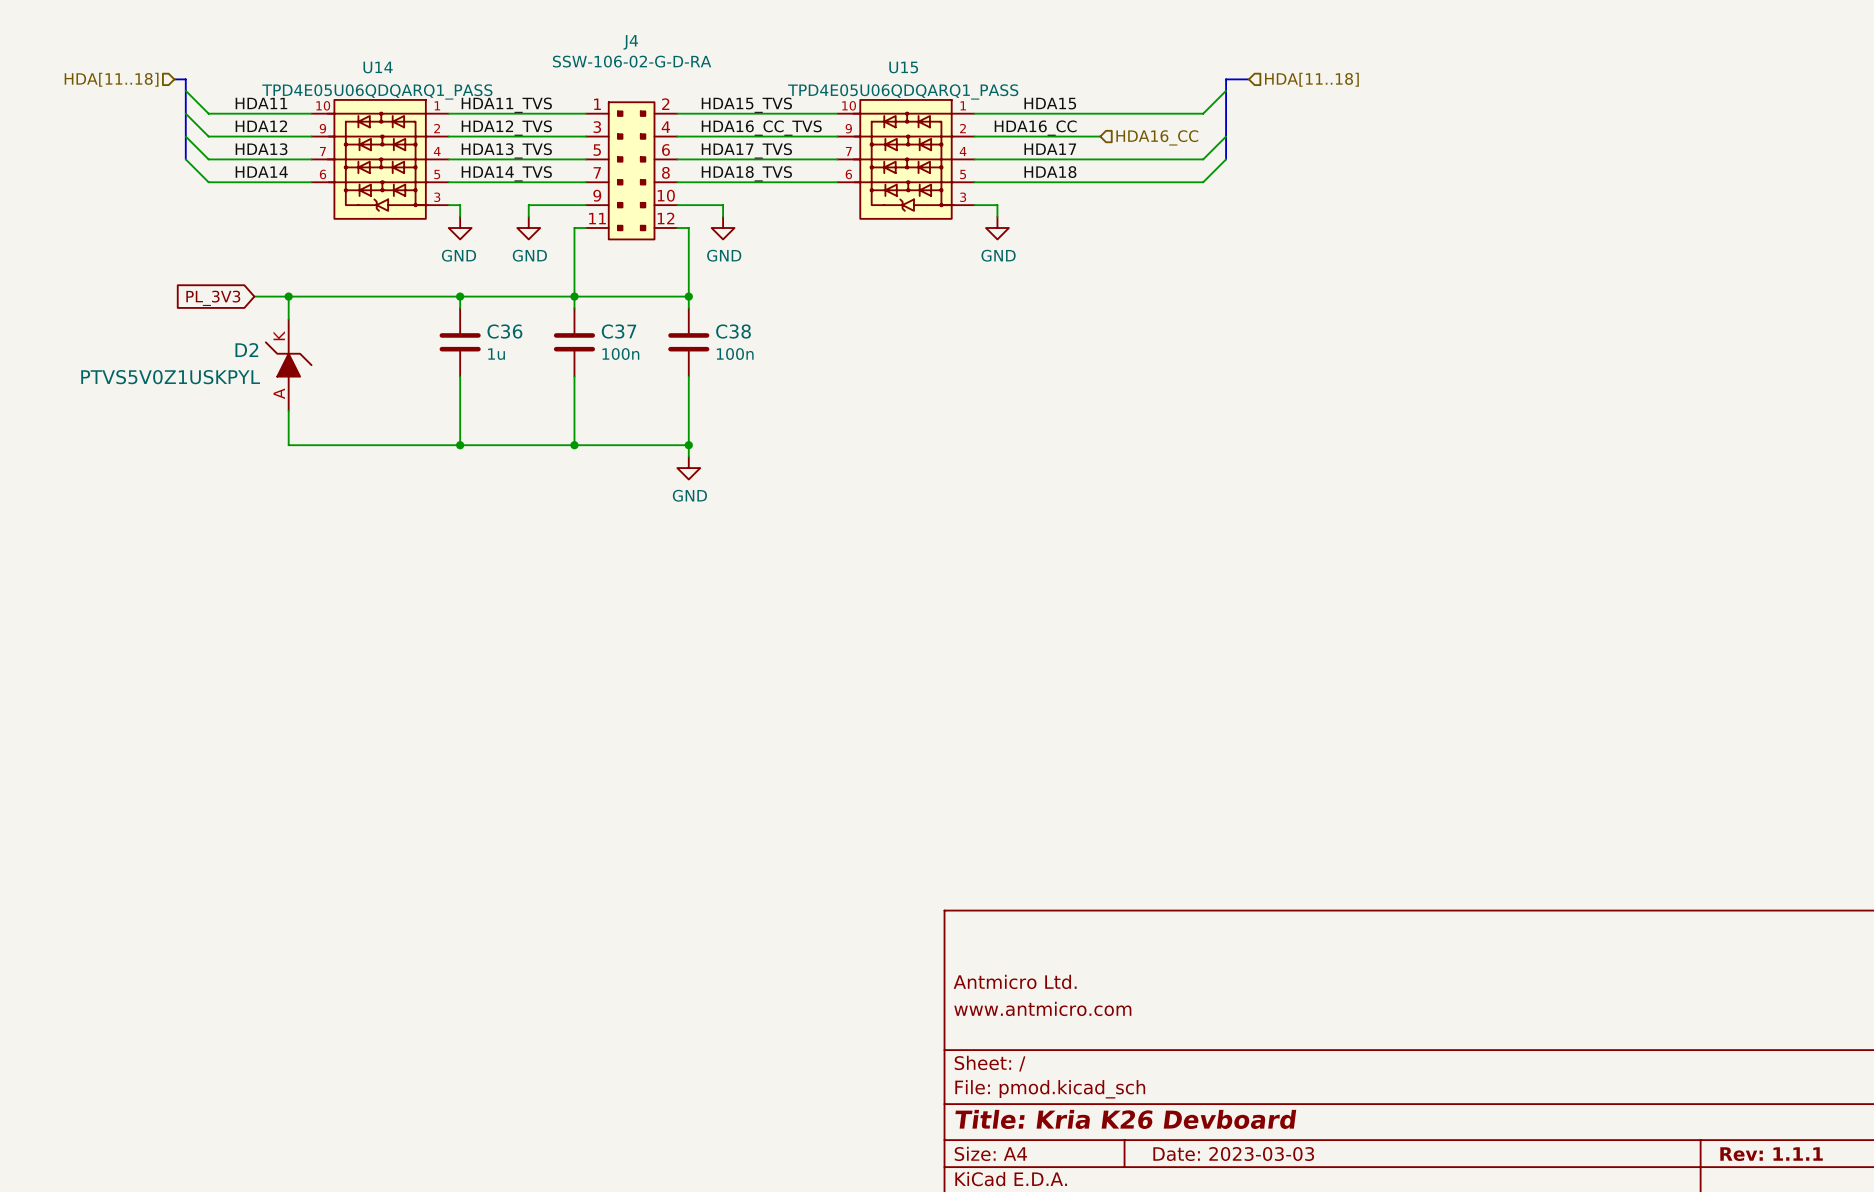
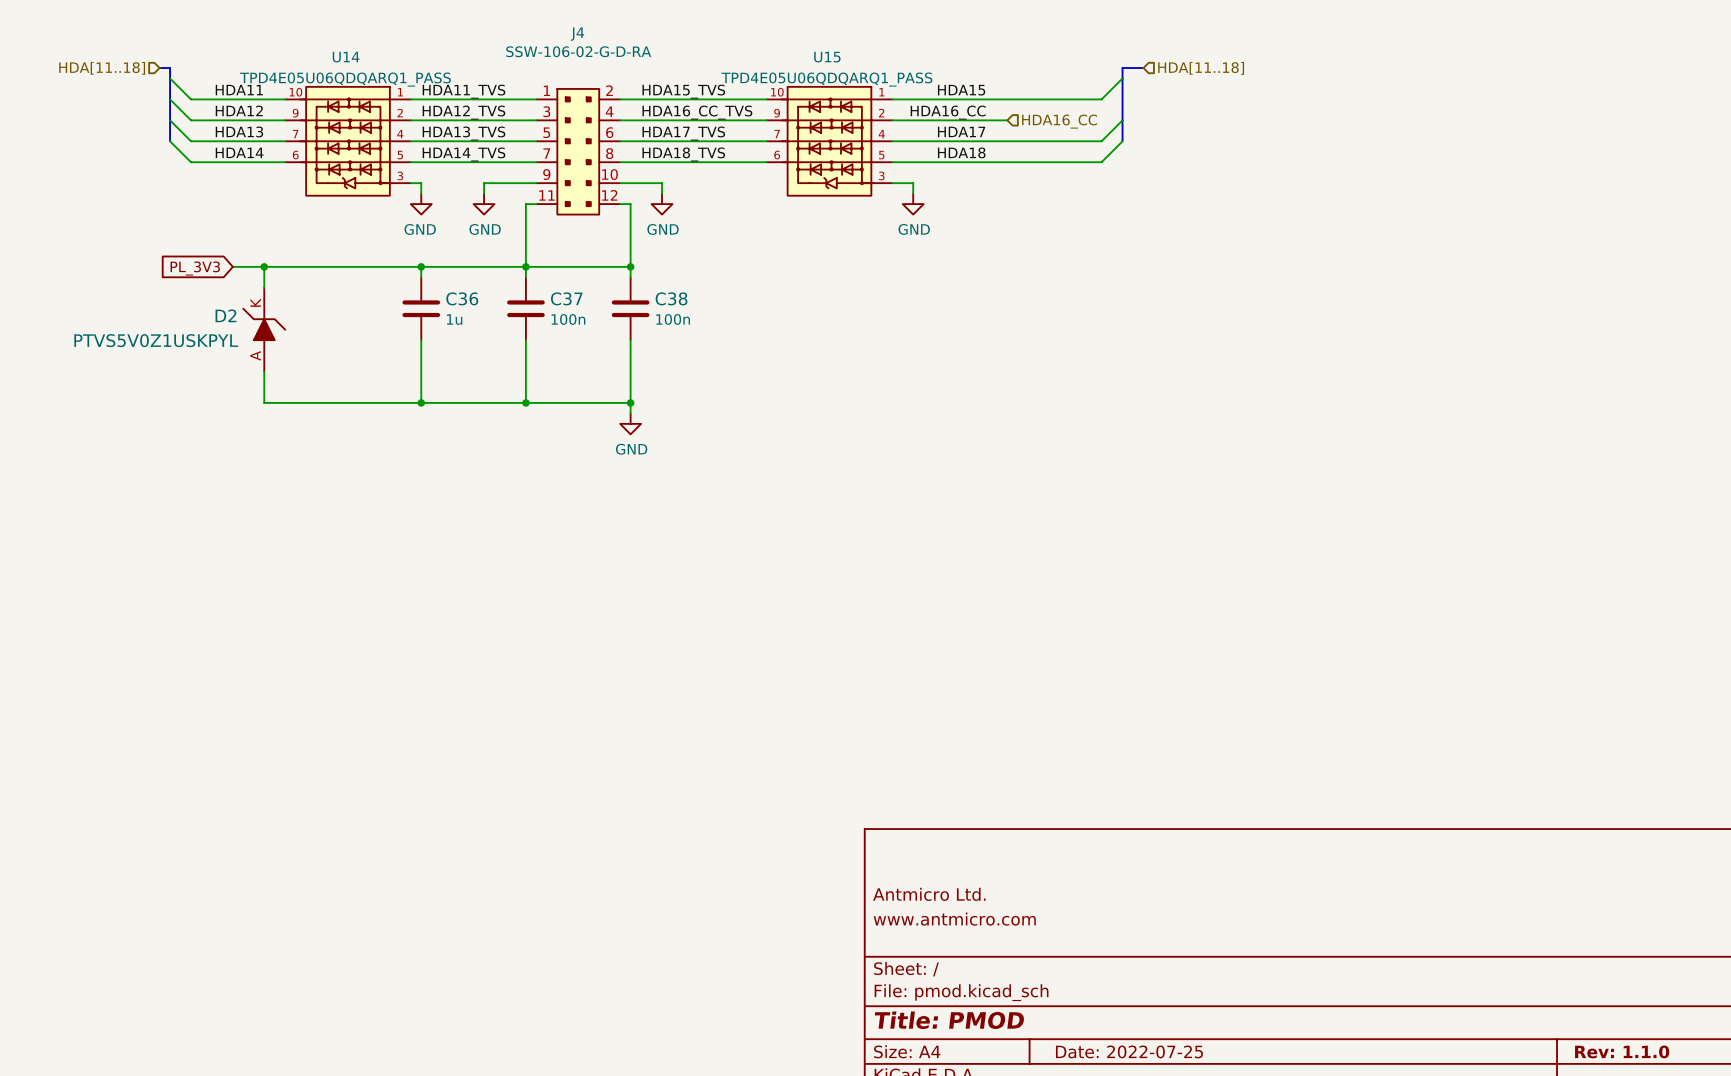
title block: Title: Kria K26 Devboard (1125, 1119) -> Title: PMOD (949, 1020)
title block: Date: 2023-03-03 (1233, 1154) -> Date: 2022-07-25 (1129, 1051)
title block: Rev: 1.1.1 (1771, 1154) -> Rev: 1.1.0 (1622, 1051)

